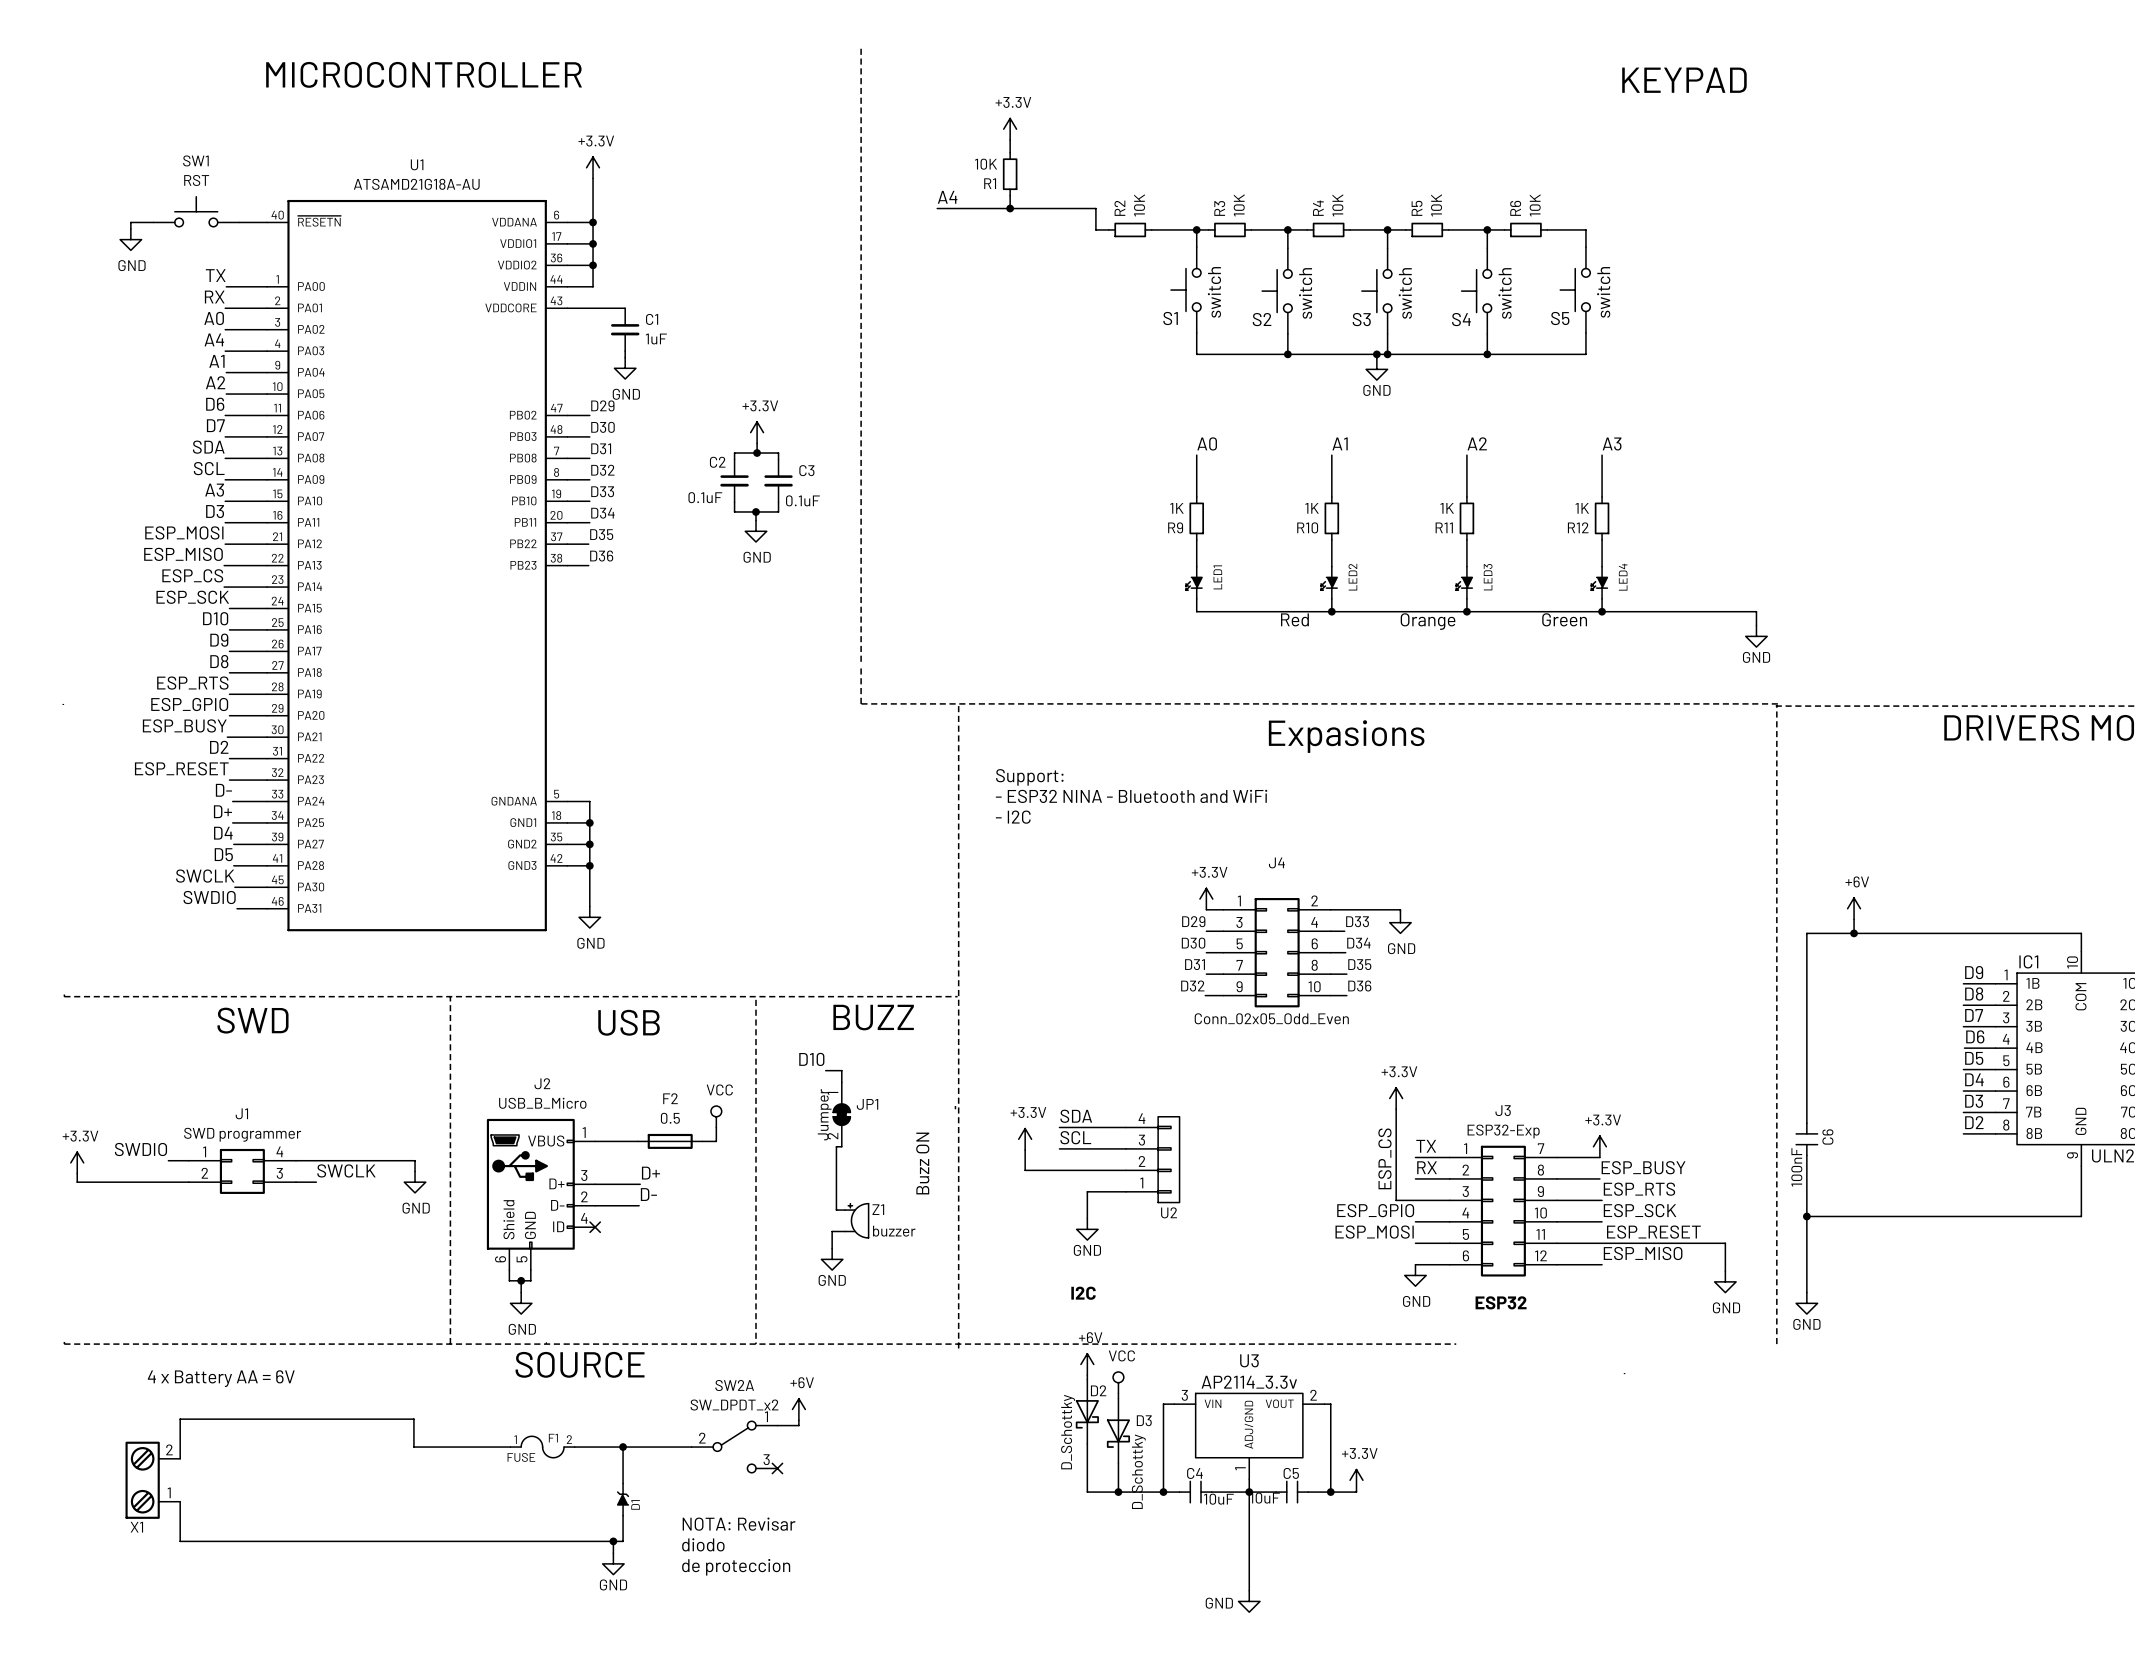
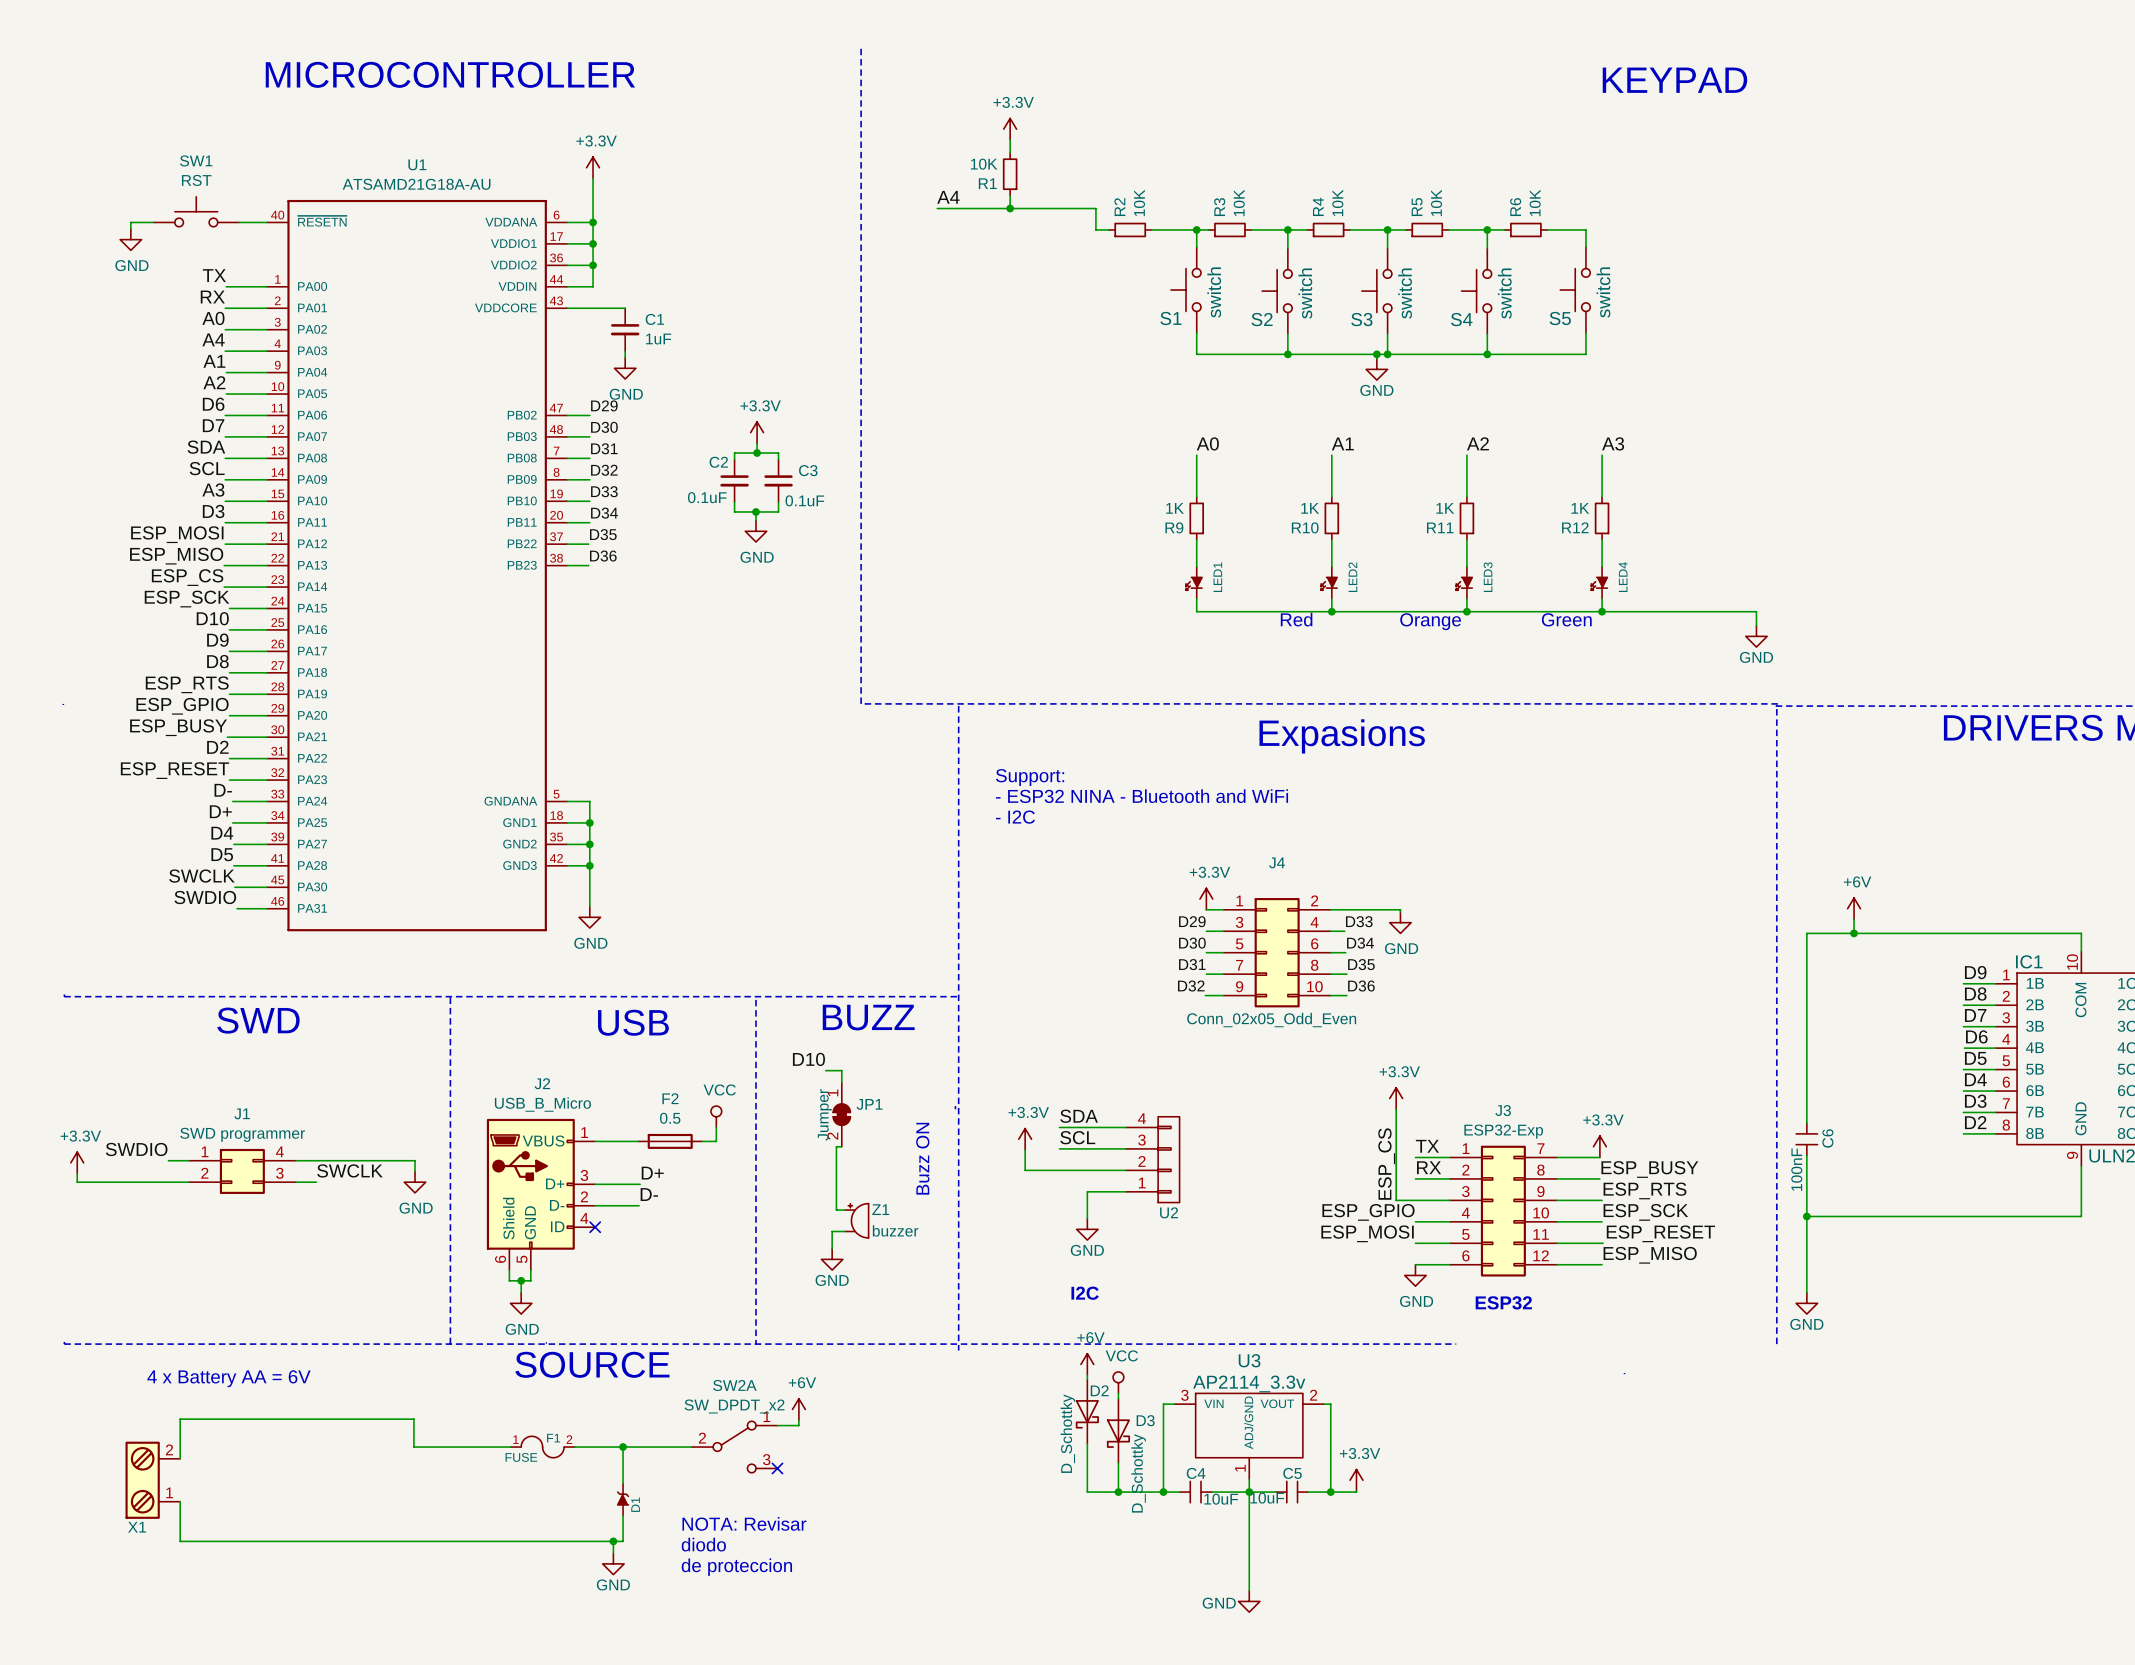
wire: (1603, 1243) (1725, 1243) (1725, 1271) -> none
power symbol: GND (1725, 1281) -> none

